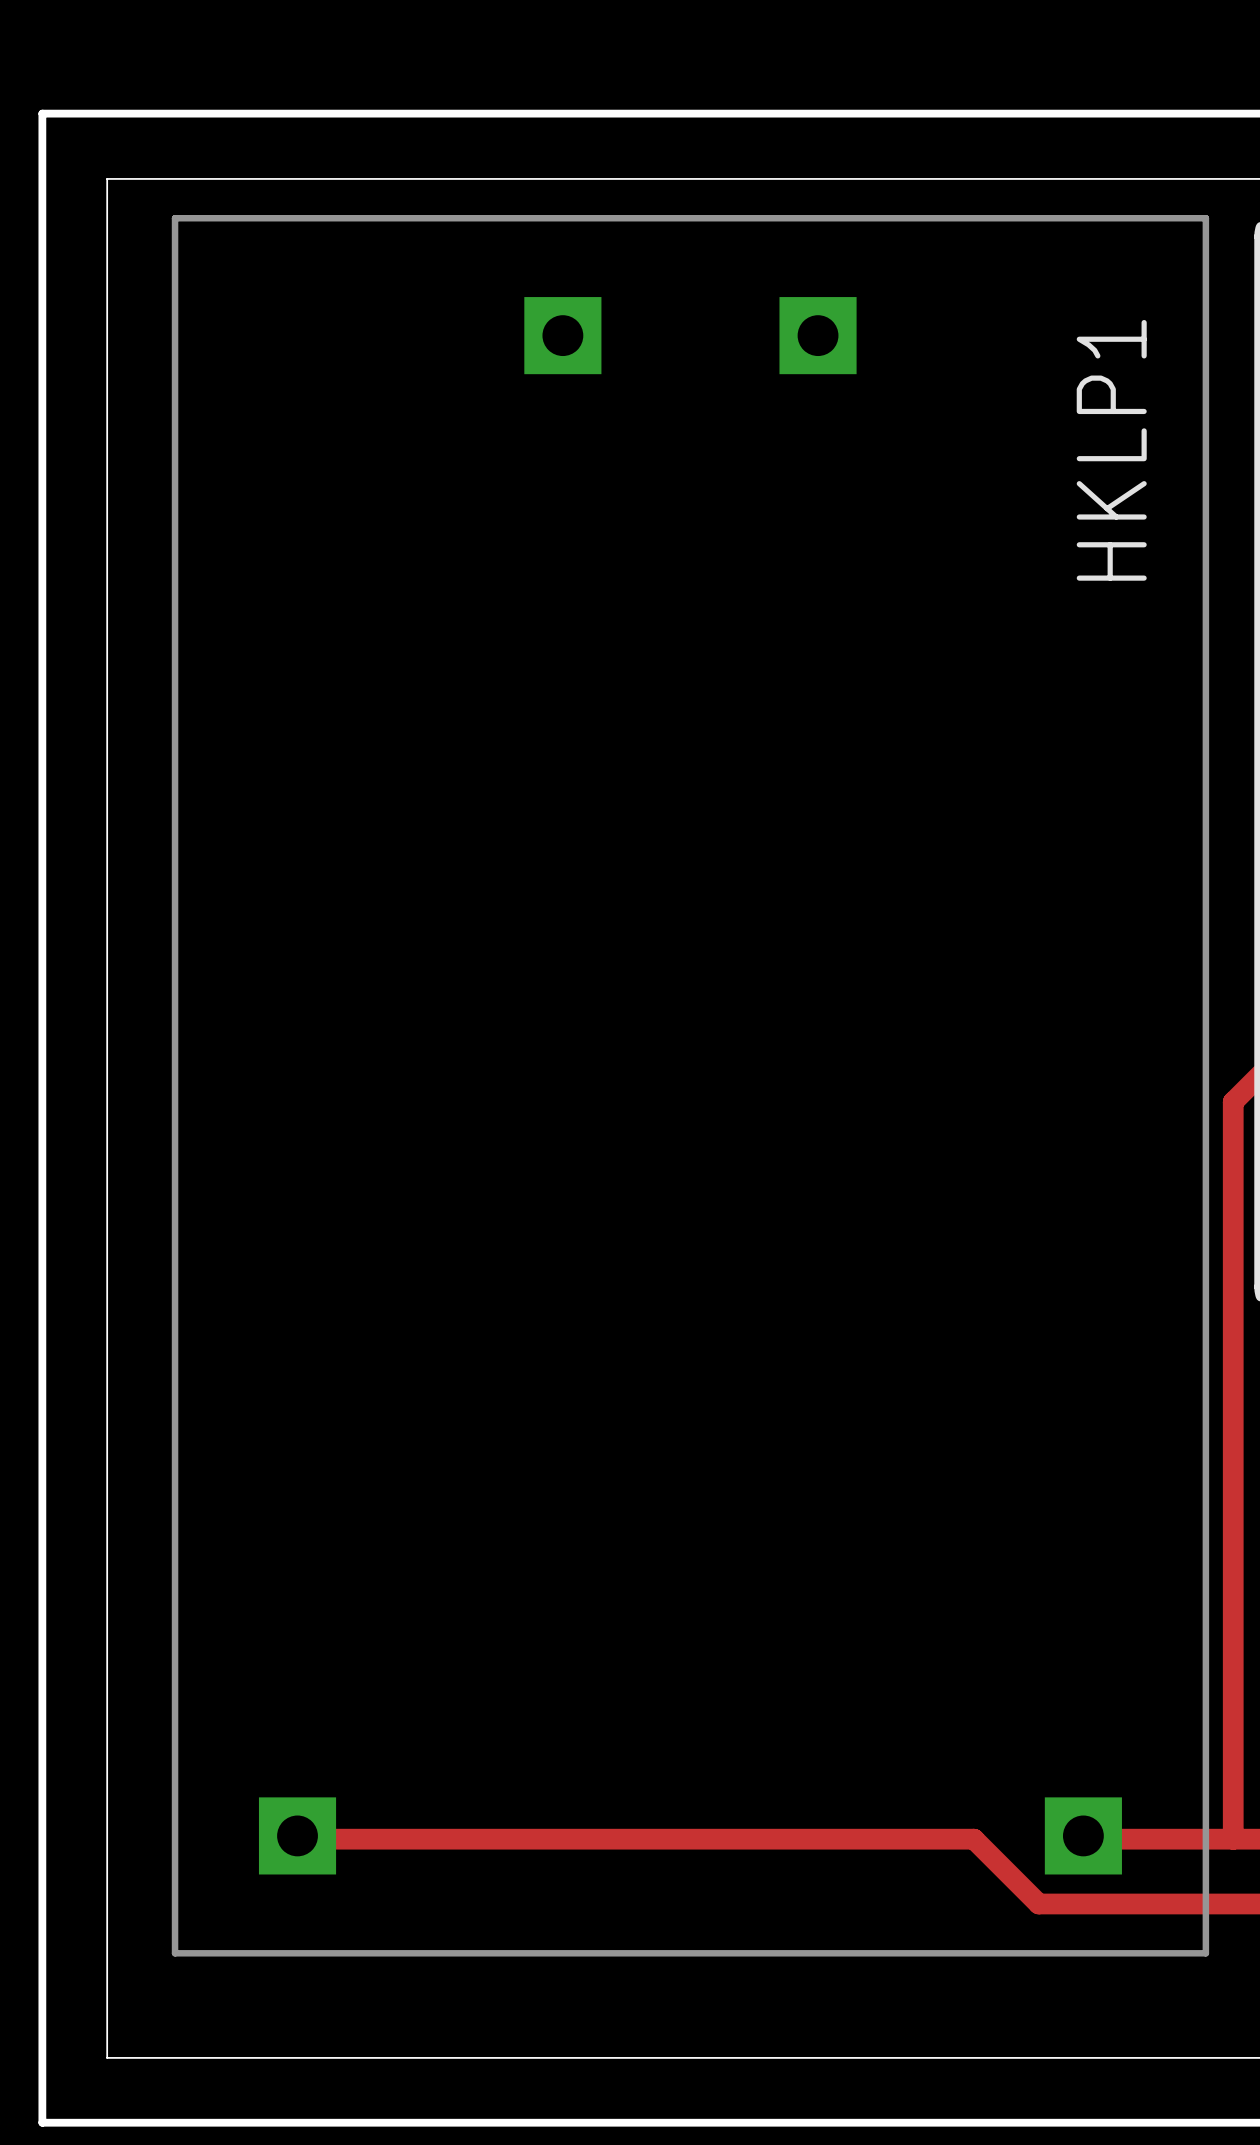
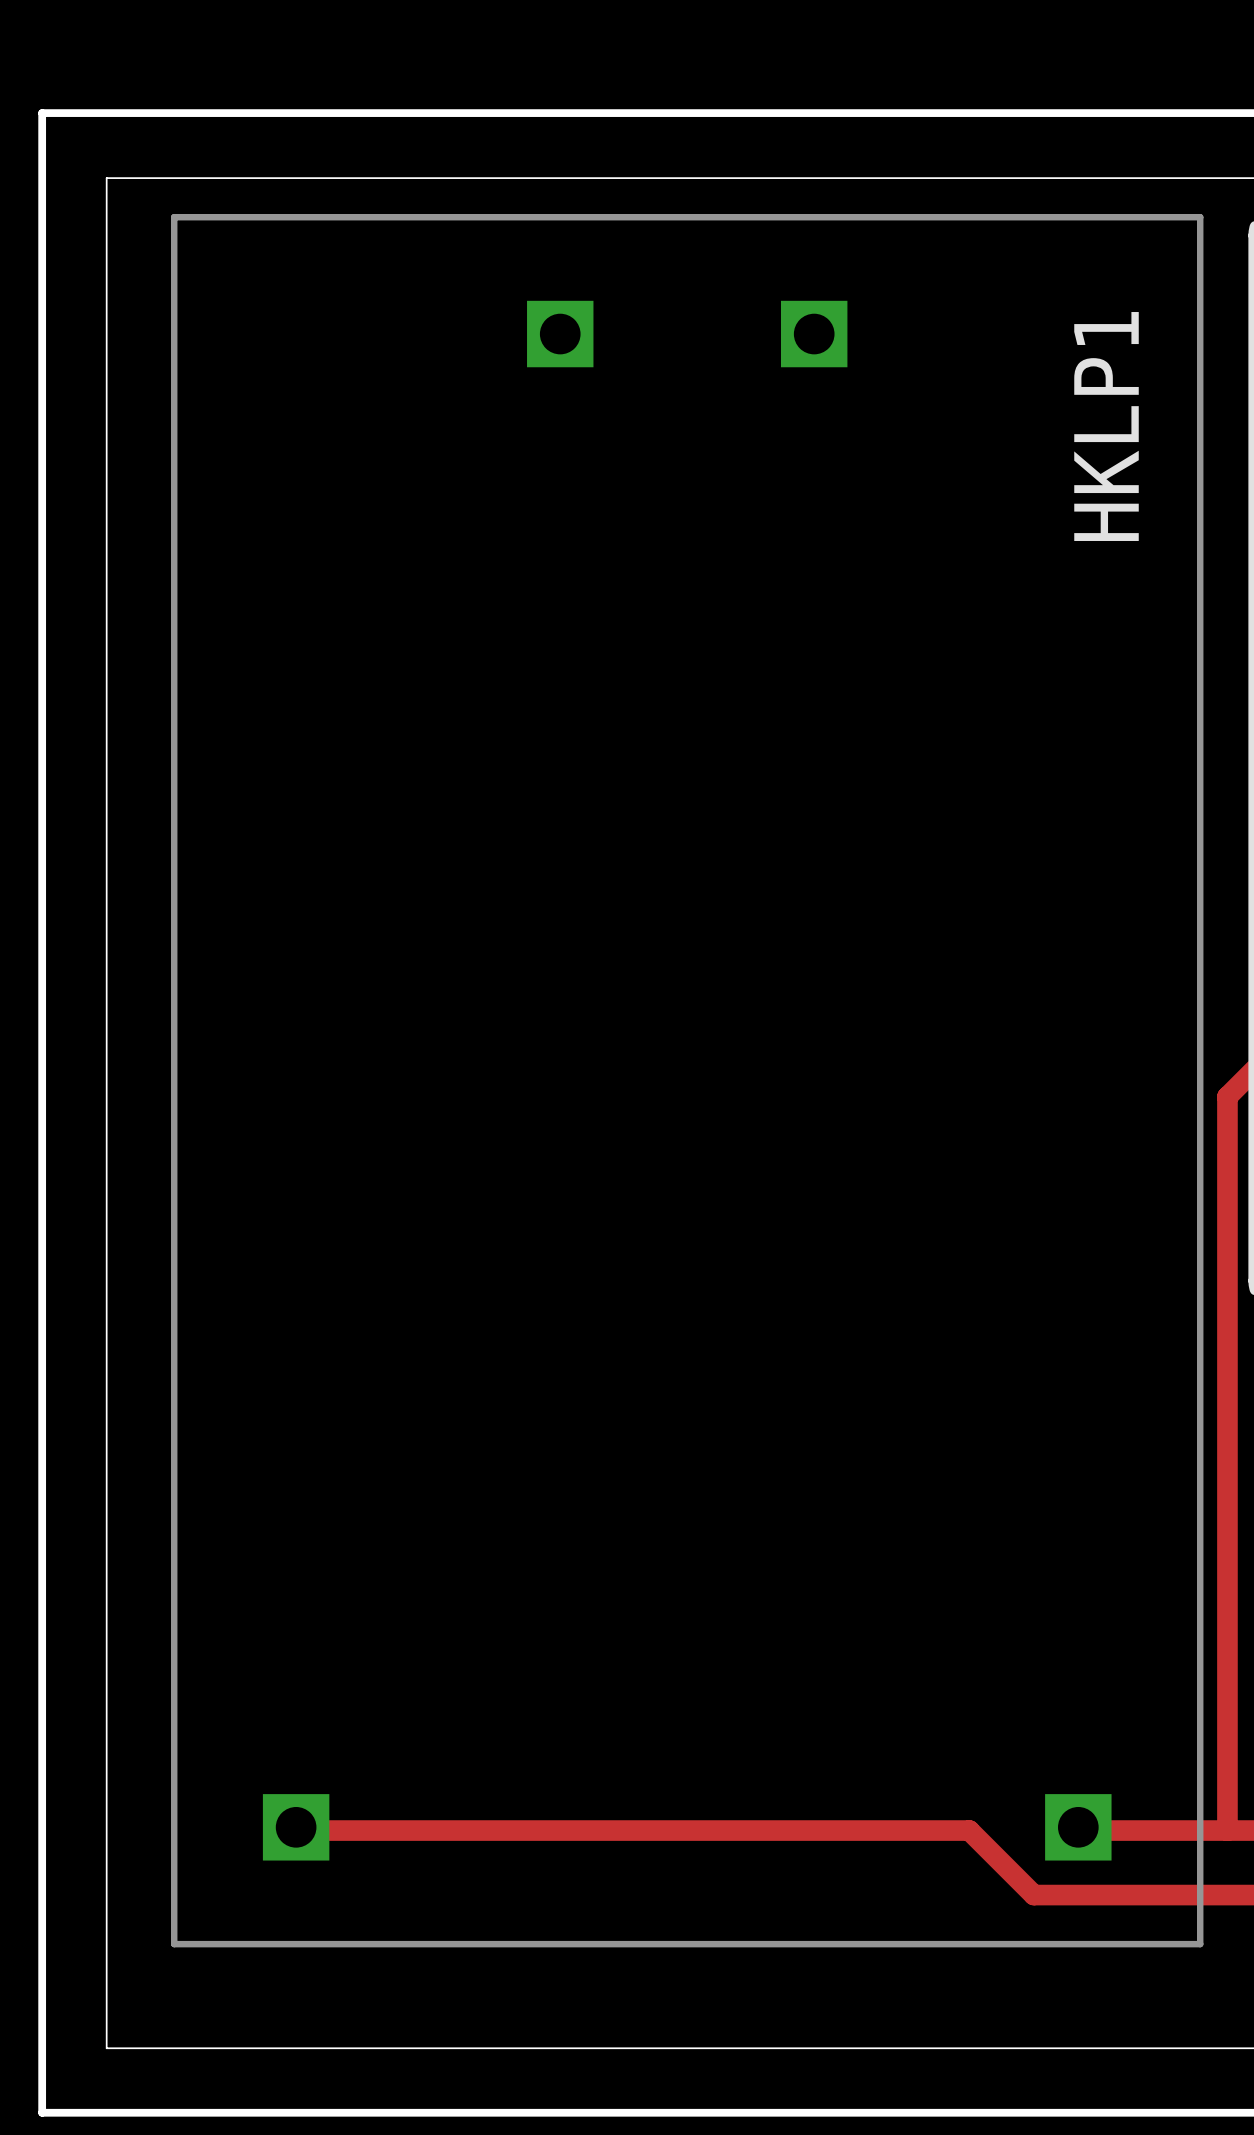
HKLP1 footprint: [171, 215, 1210, 1957] -> [170, 213, 1204, 1948]

